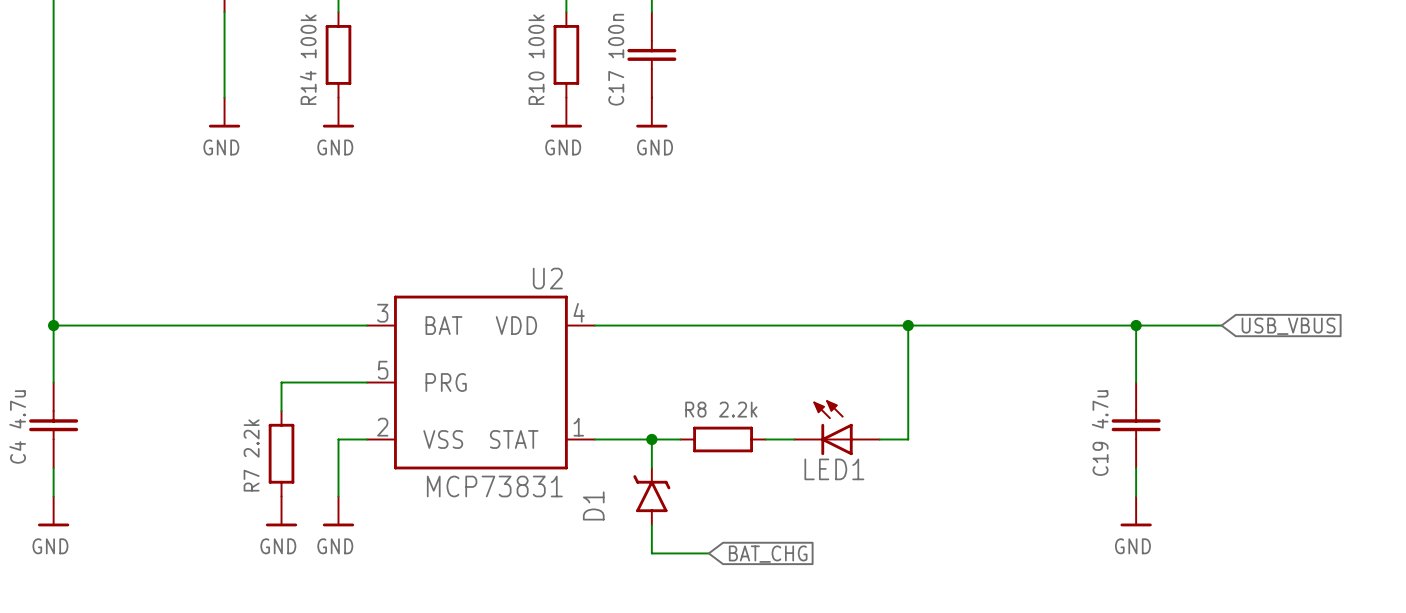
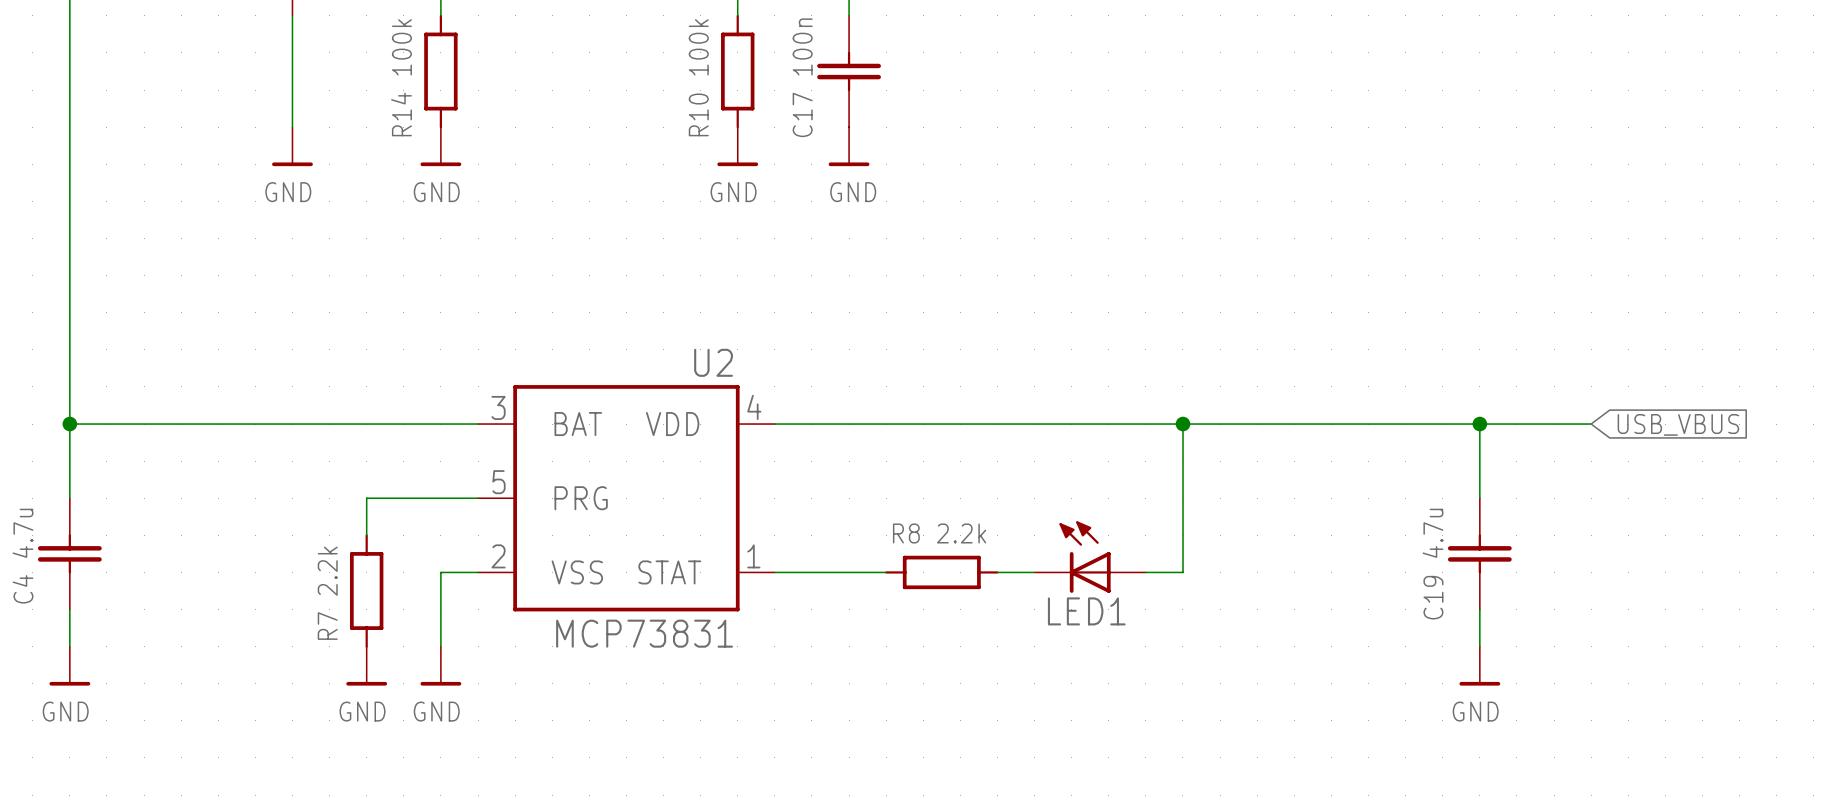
wire: (651, 439) (651, 467) -> none
junction: (651, 439) -> none
D1: (651, 496) -> none
wire: (651, 524) (651, 553) (708, 553) -> none
global label: BAT_CHG (768, 554) -> none

